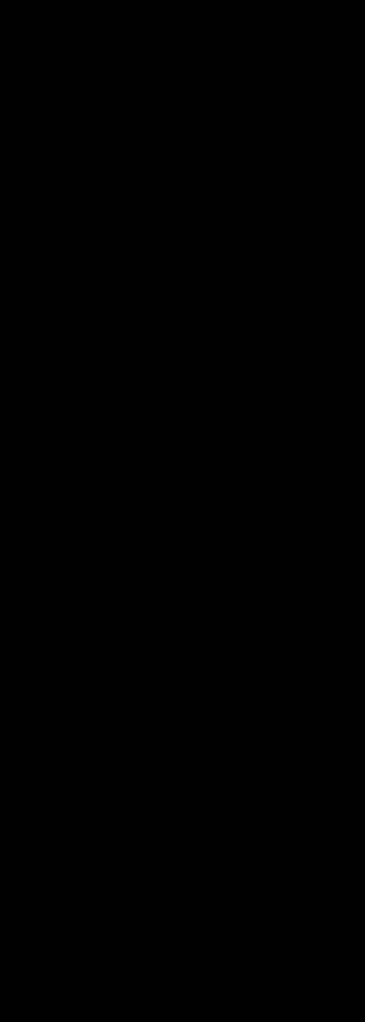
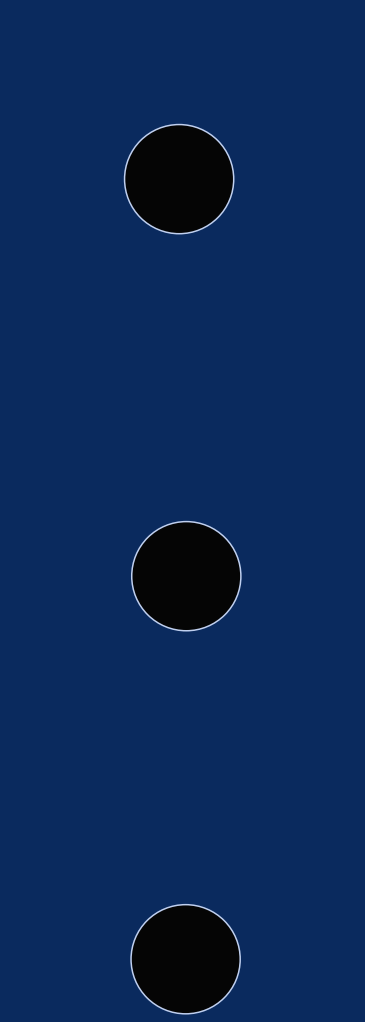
part: none -> (179, 179)
part: none -> (186, 576)
part: none -> (185, 959)

